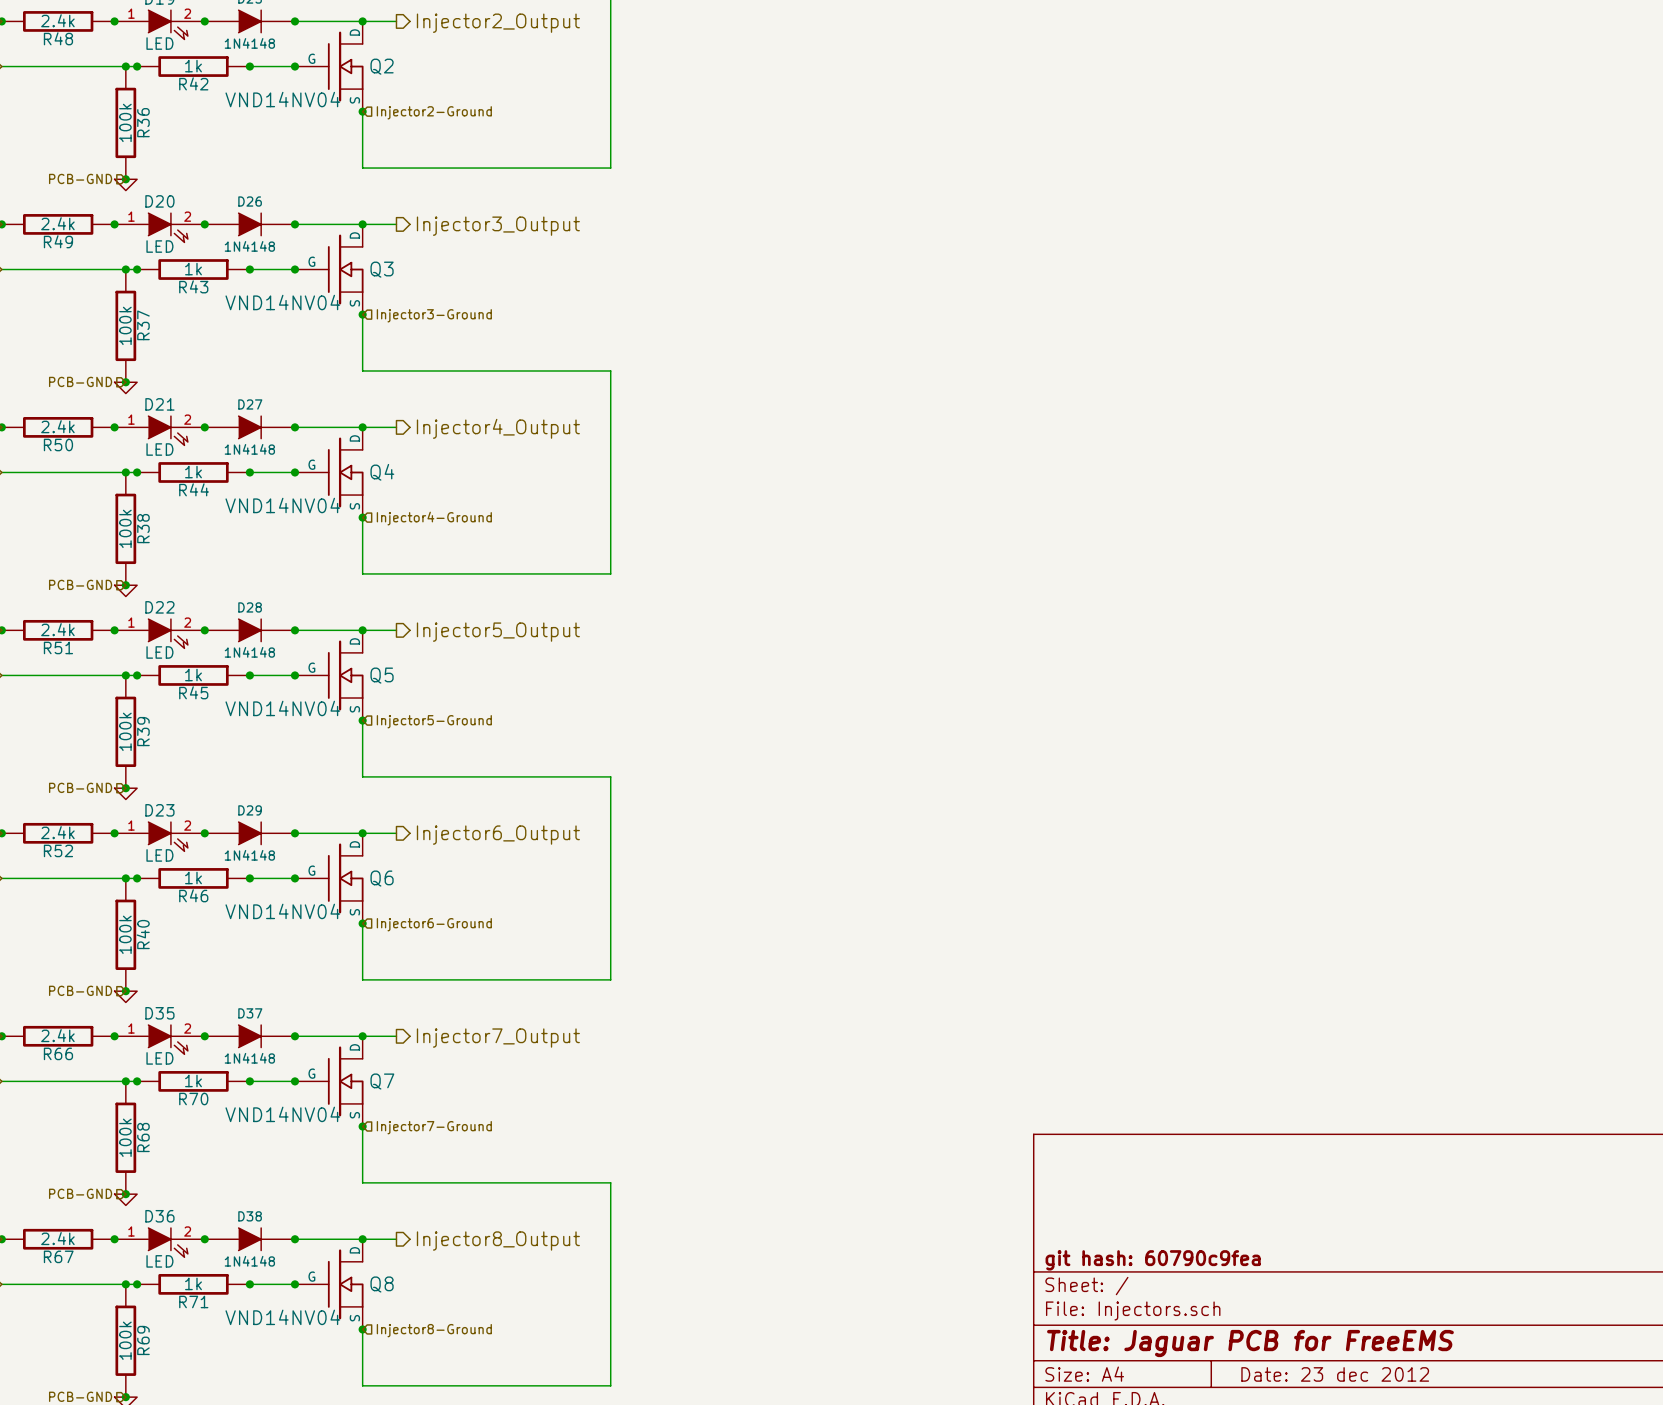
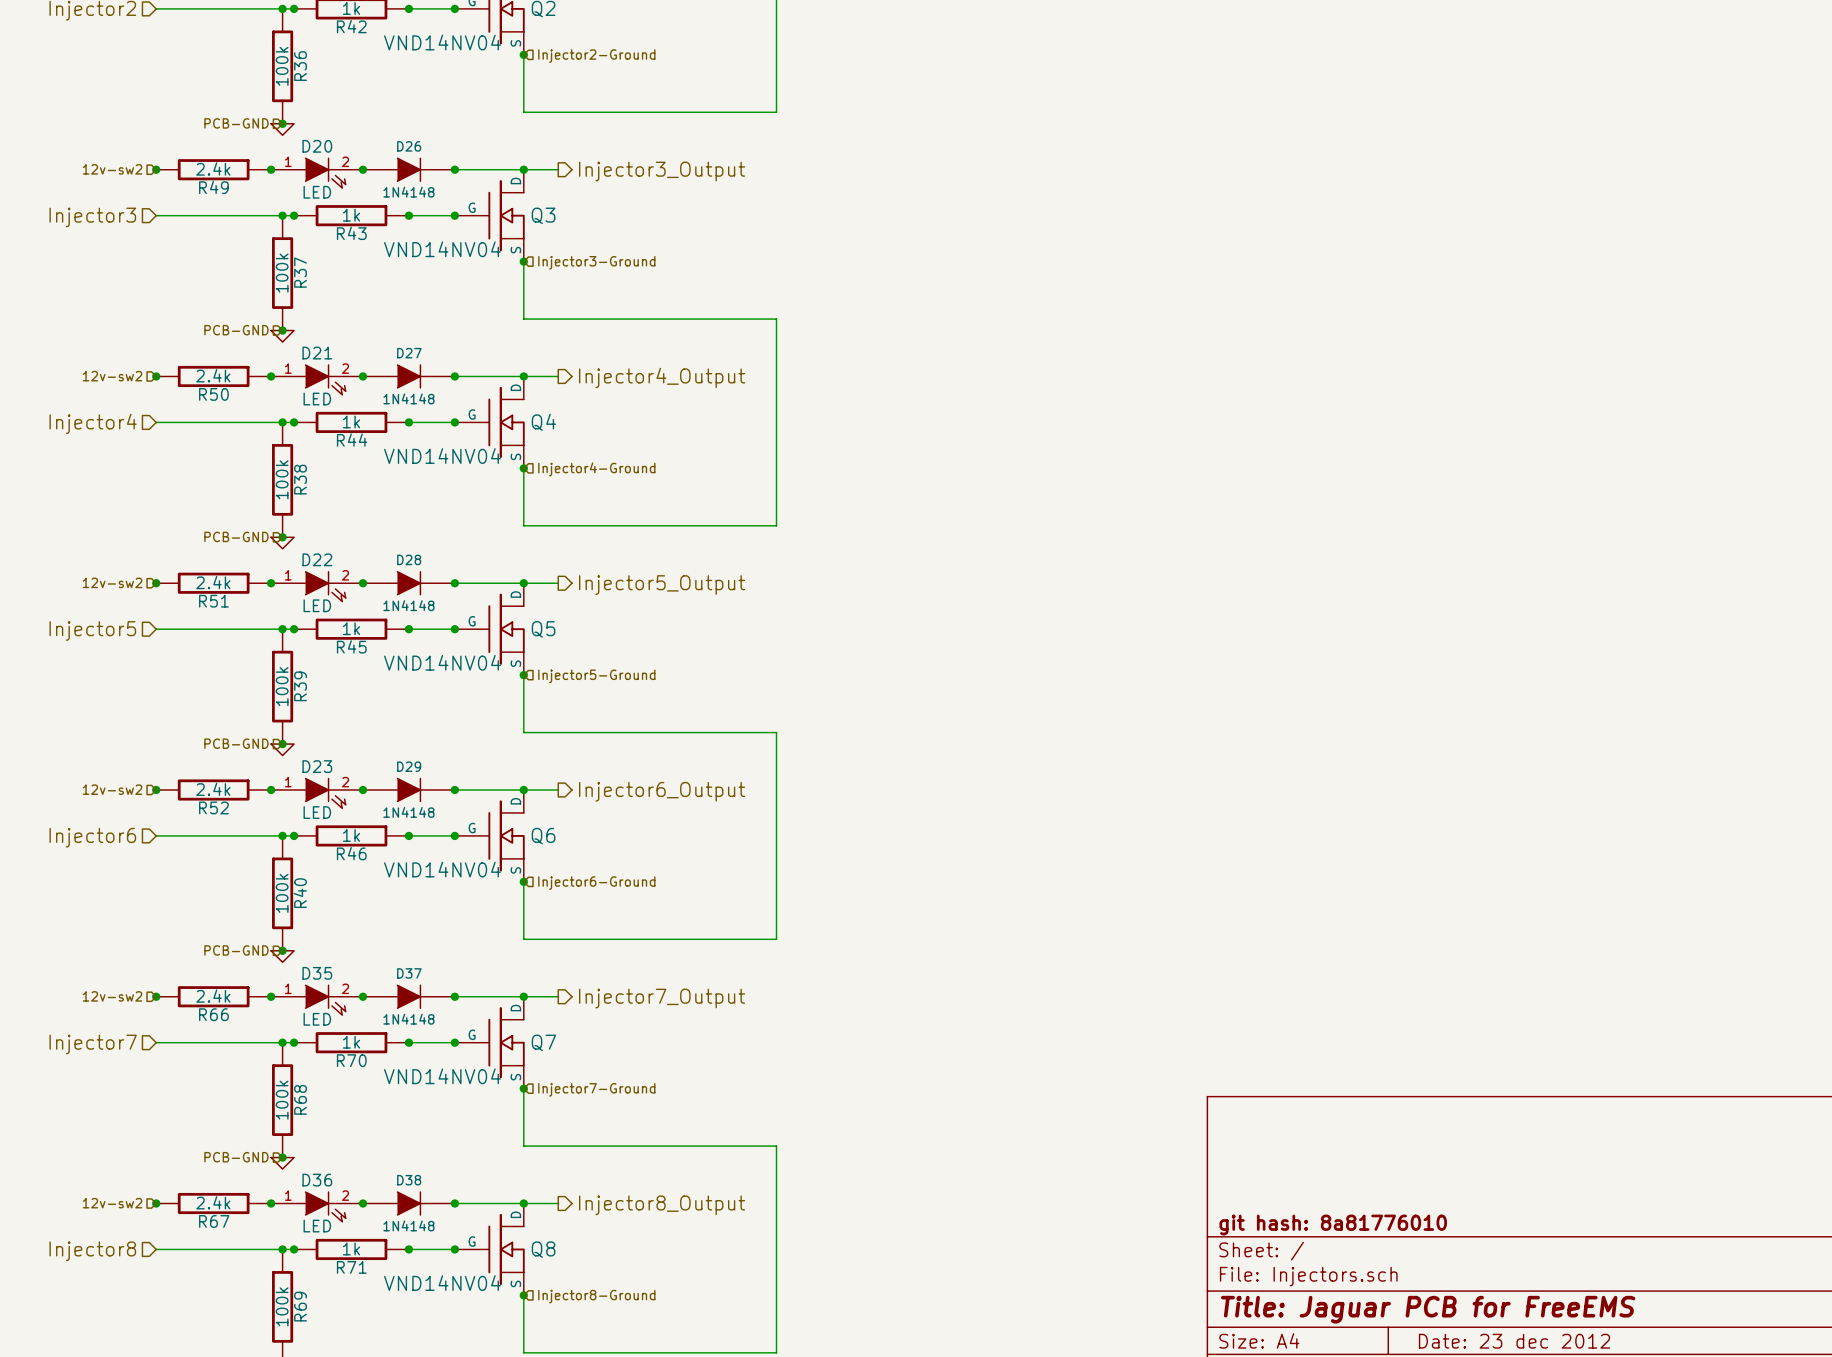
title block: git hash: 60790c9fea (1153, 1260) -> git hash: 8a81776010 (1333, 1225)

